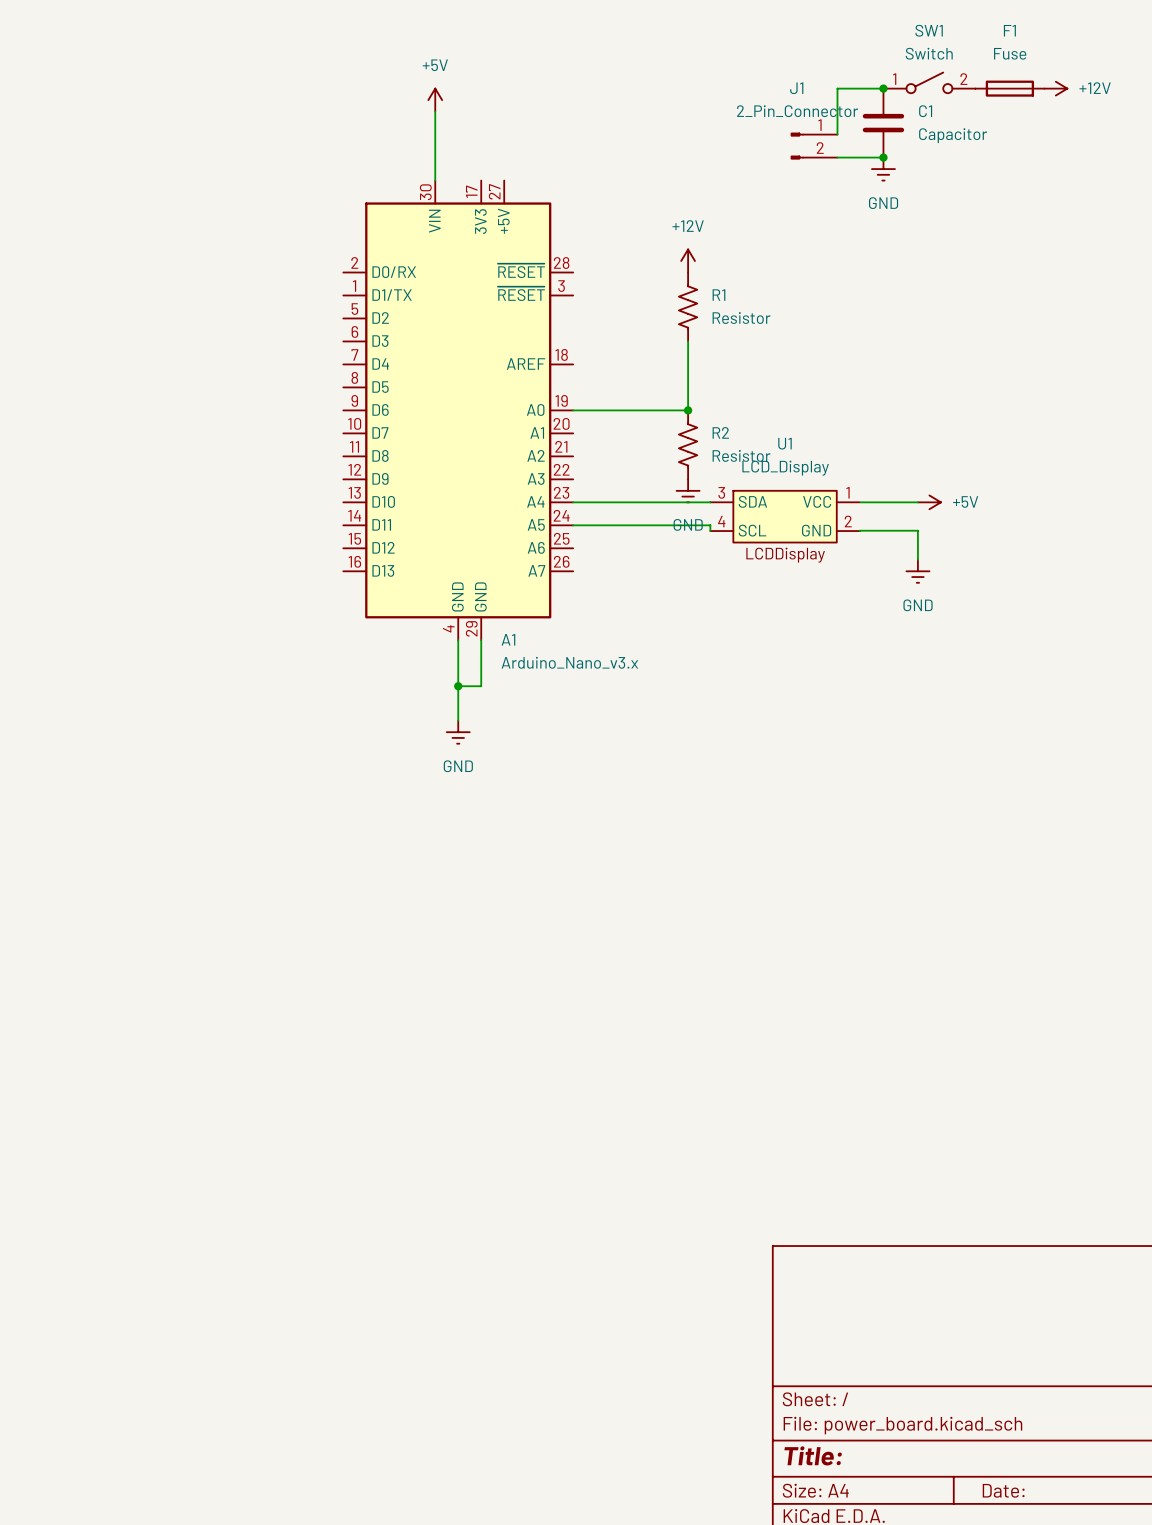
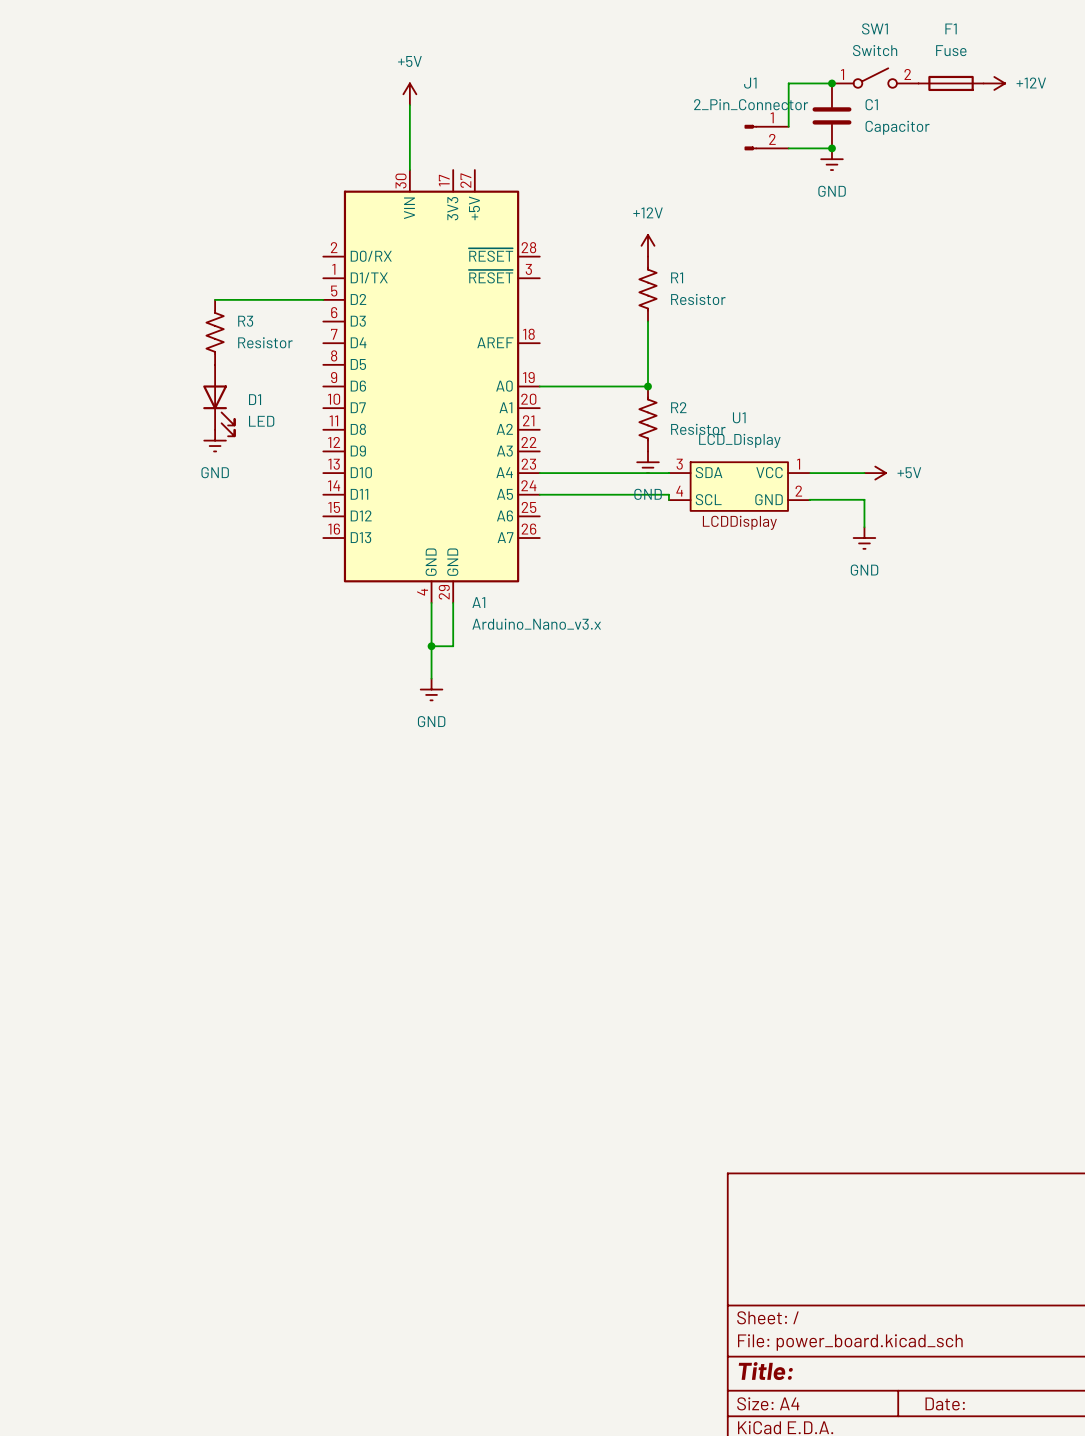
wire: none -> (215, 299) (323, 299)
R3: none -> Resistor (215, 332)
D1: none -> LED (218, 400)
power symbol: none -> GND (215, 440)

